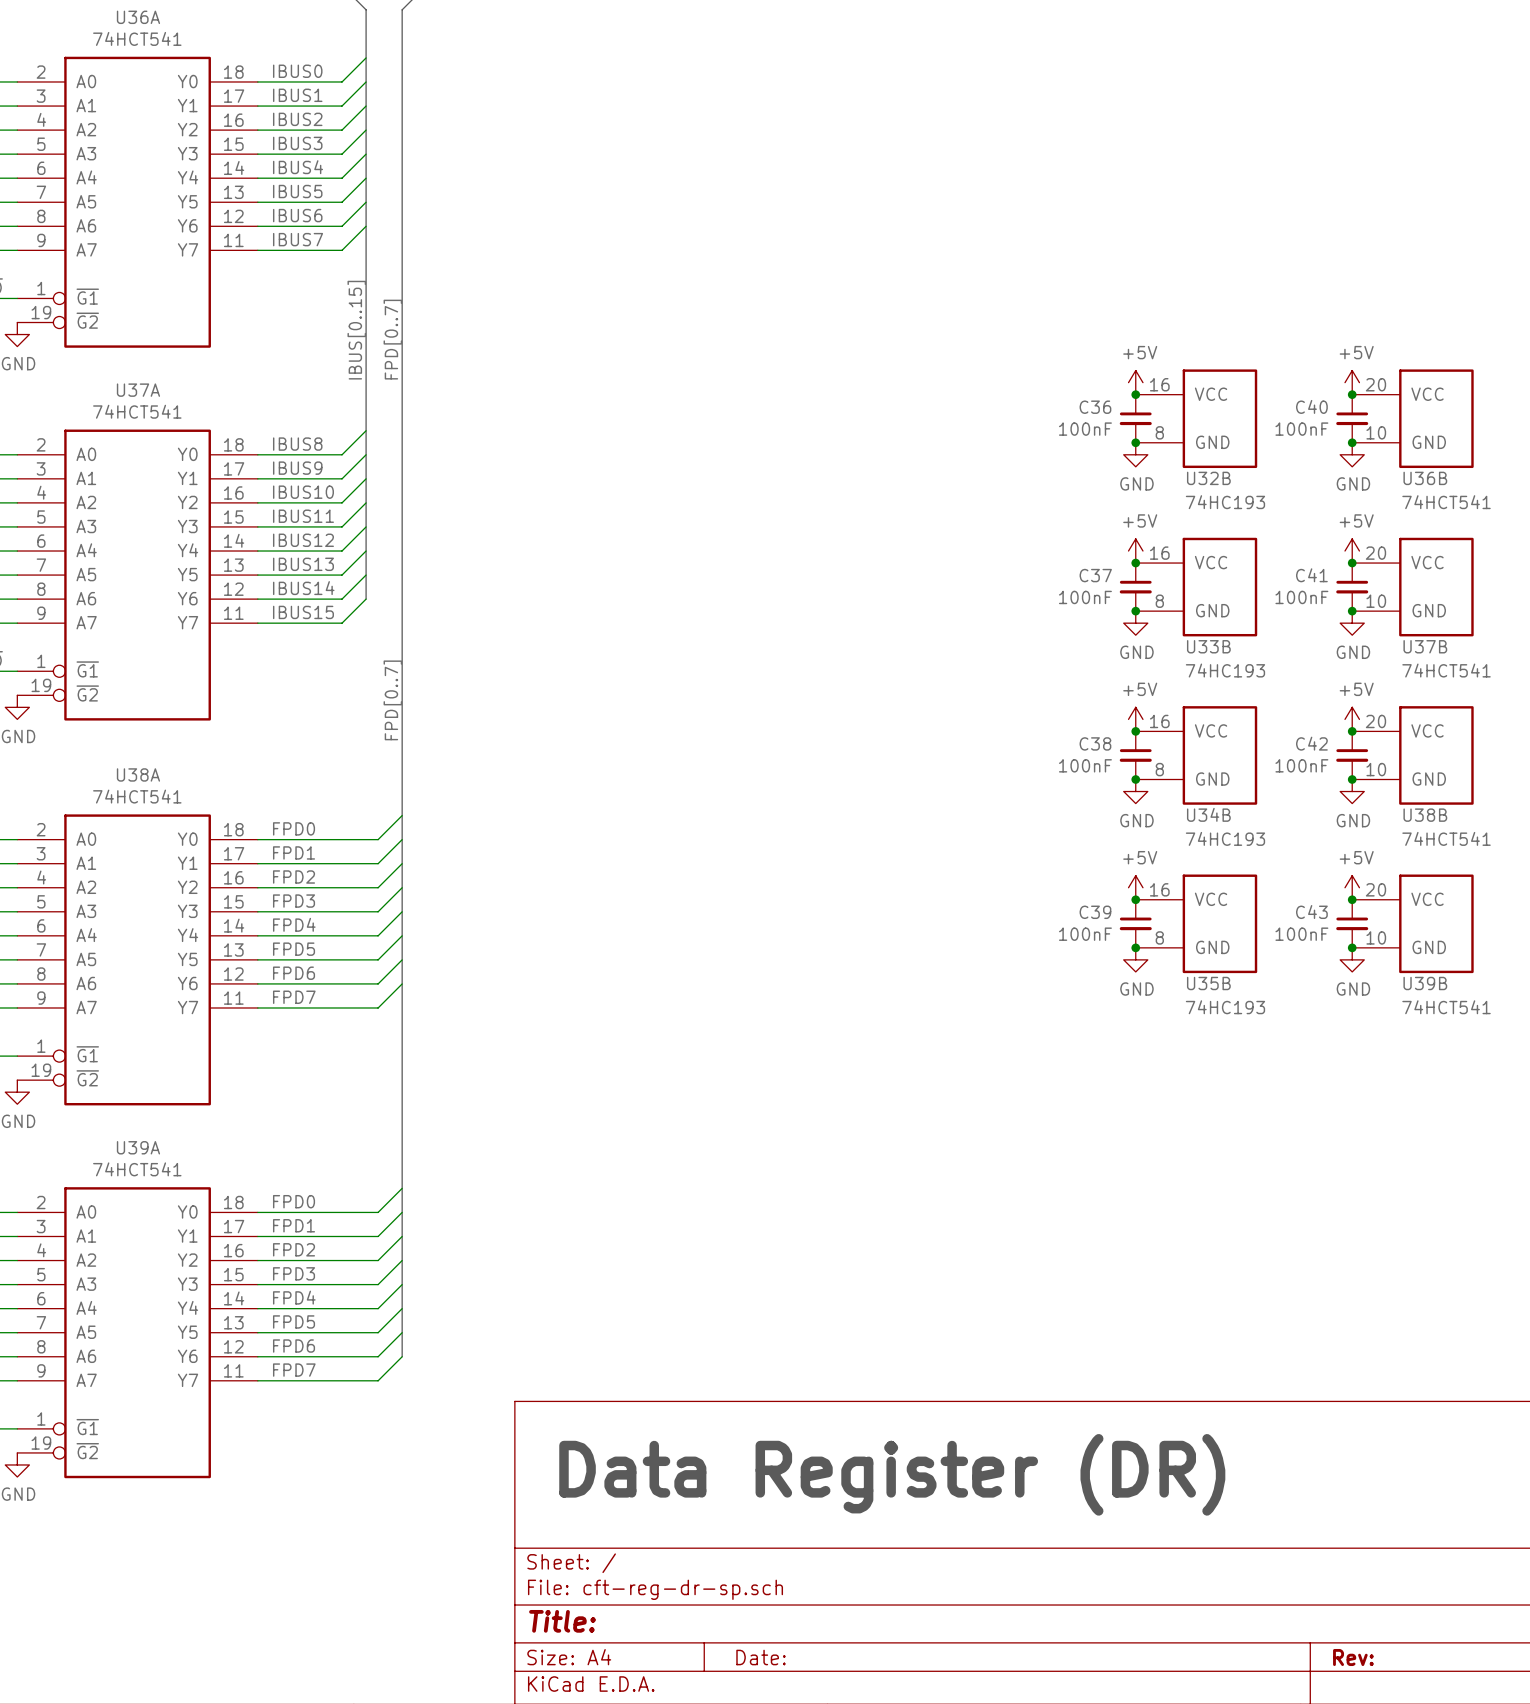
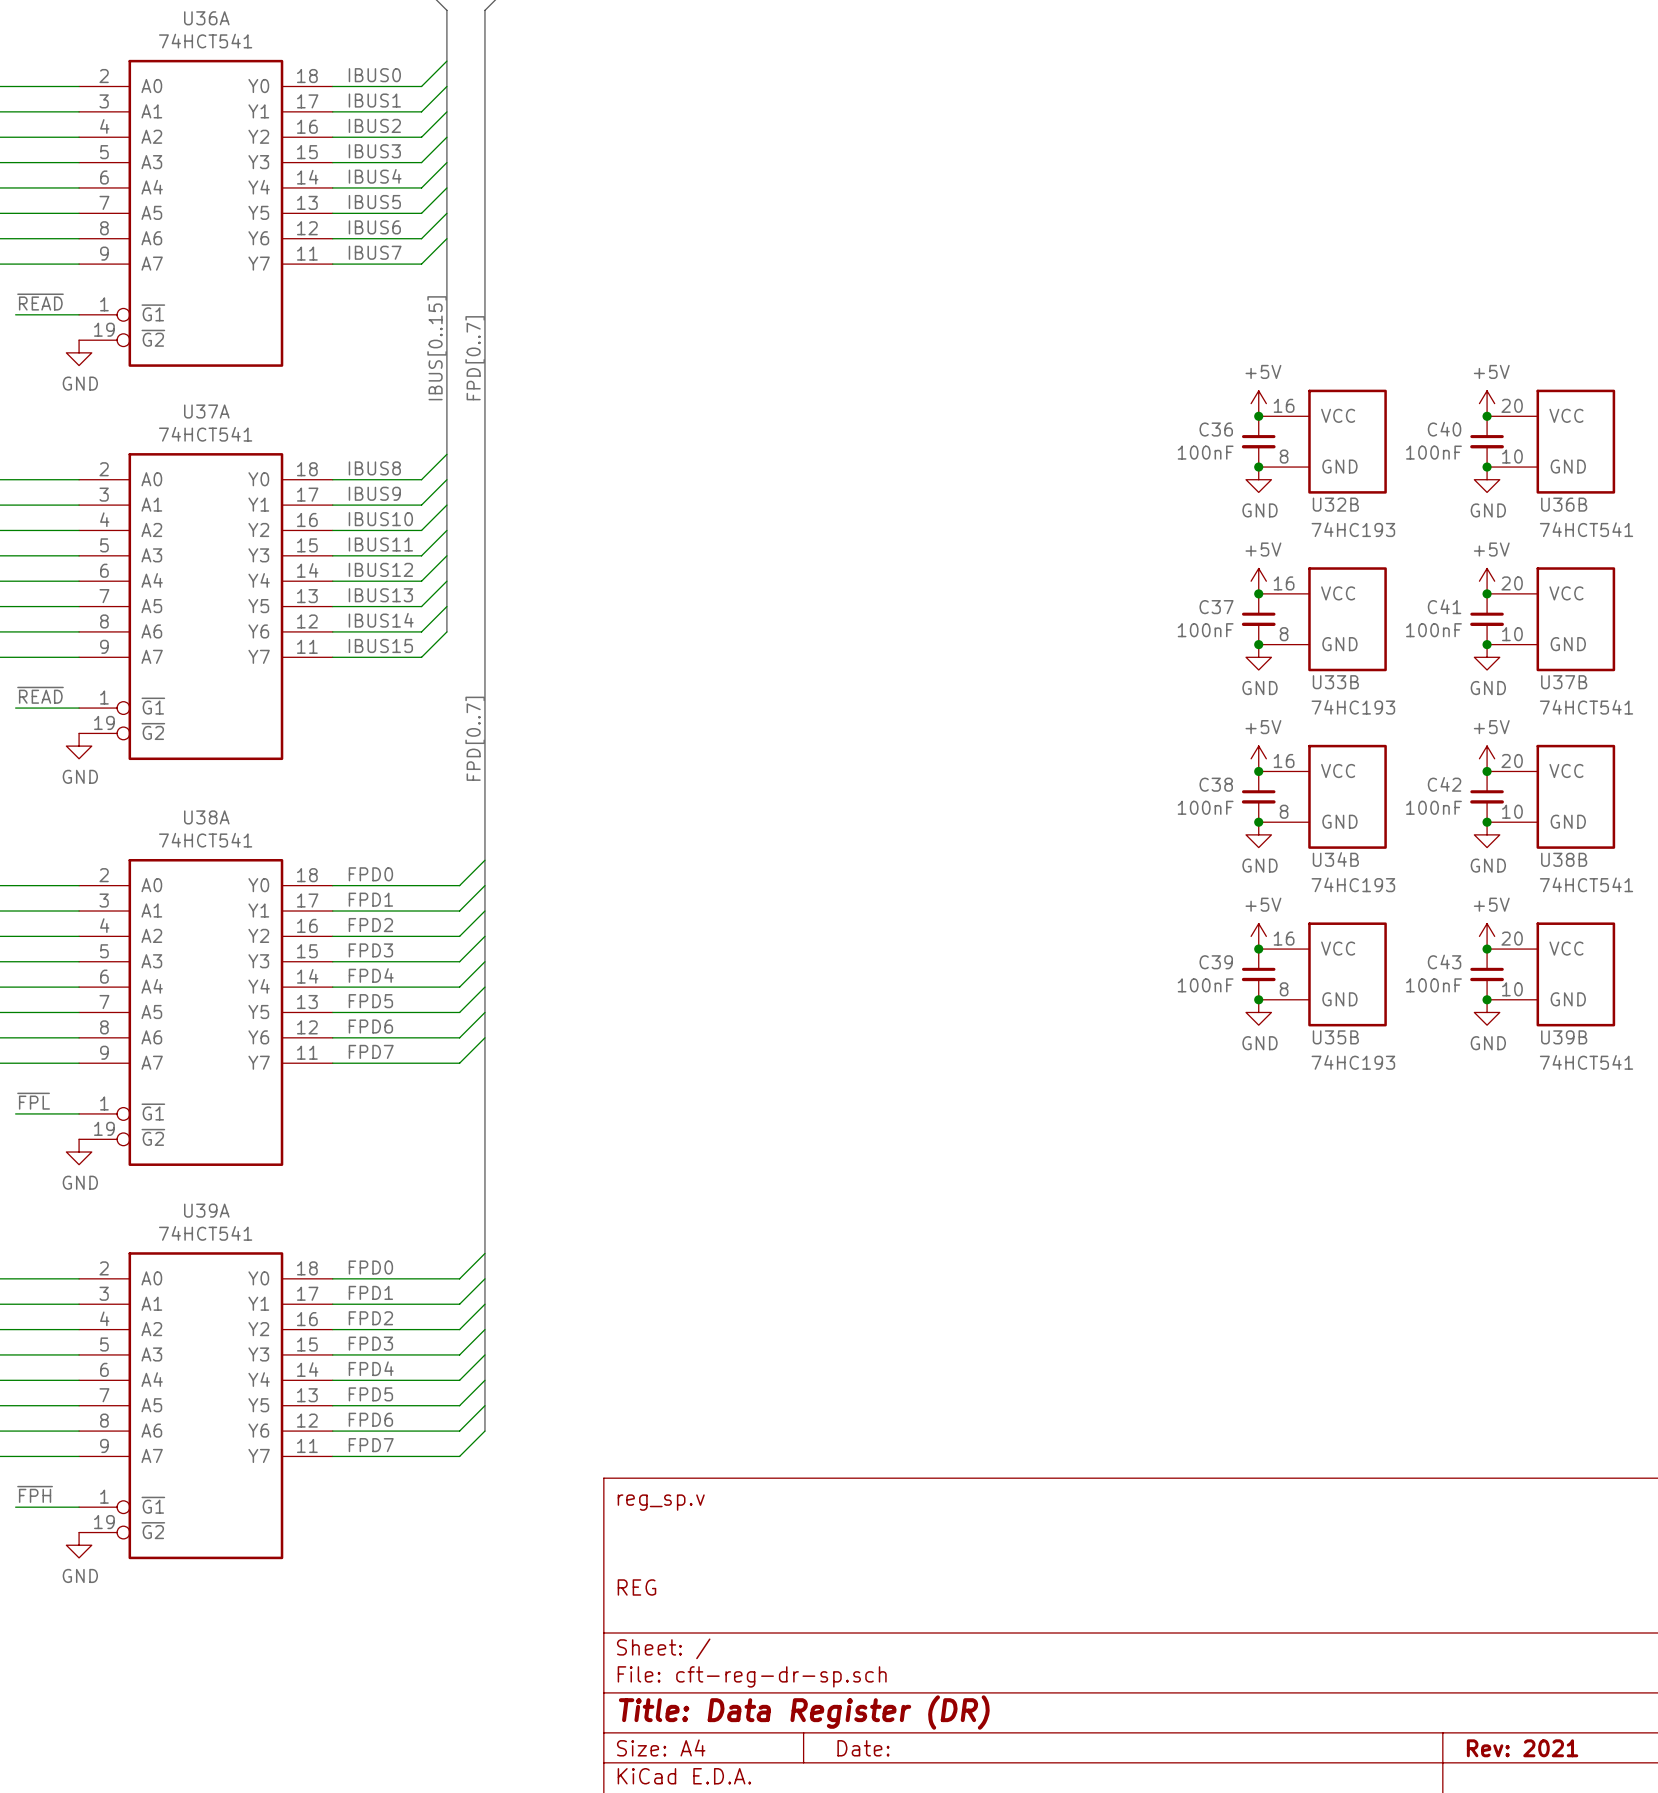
title block: none -> reg_sp.v (661, 1502)
text: Data Register (DR) (892, 1474) -> none
title block: none -> REG (636, 1587)
title block: Title: (562, 1621) -> Title: Data Register (DR) (804, 1712)
title block: Rev: (1353, 1657) -> Rev: 2021 (1522, 1748)

